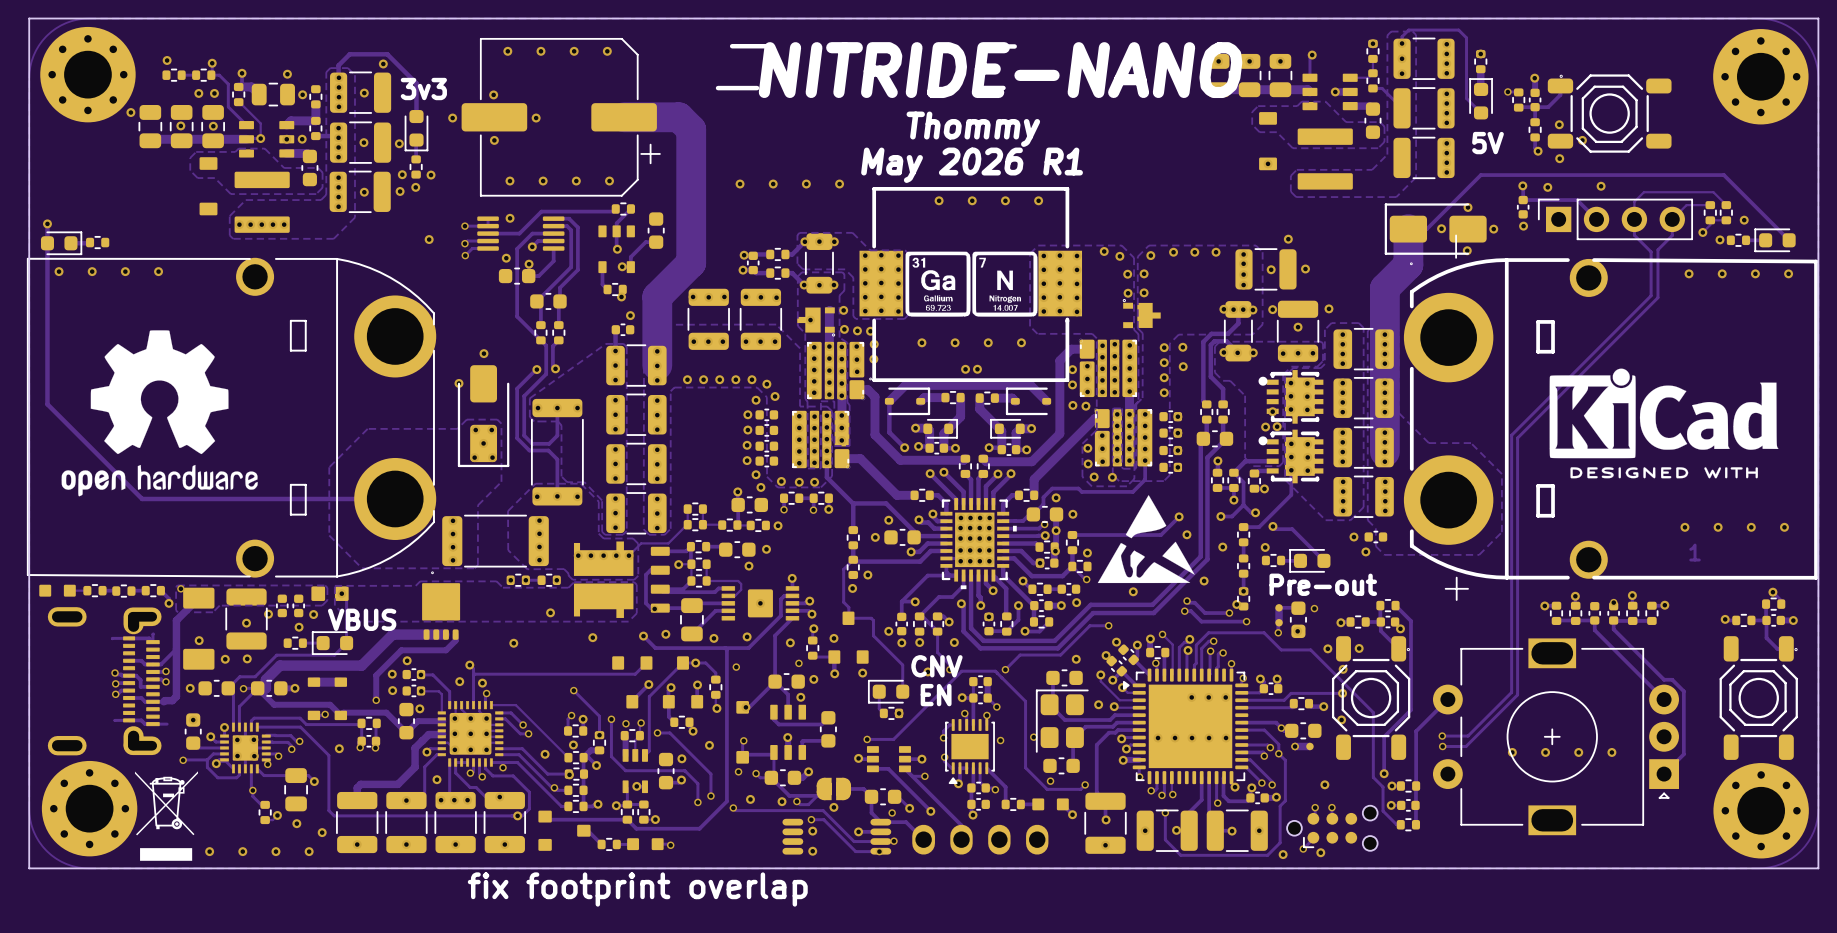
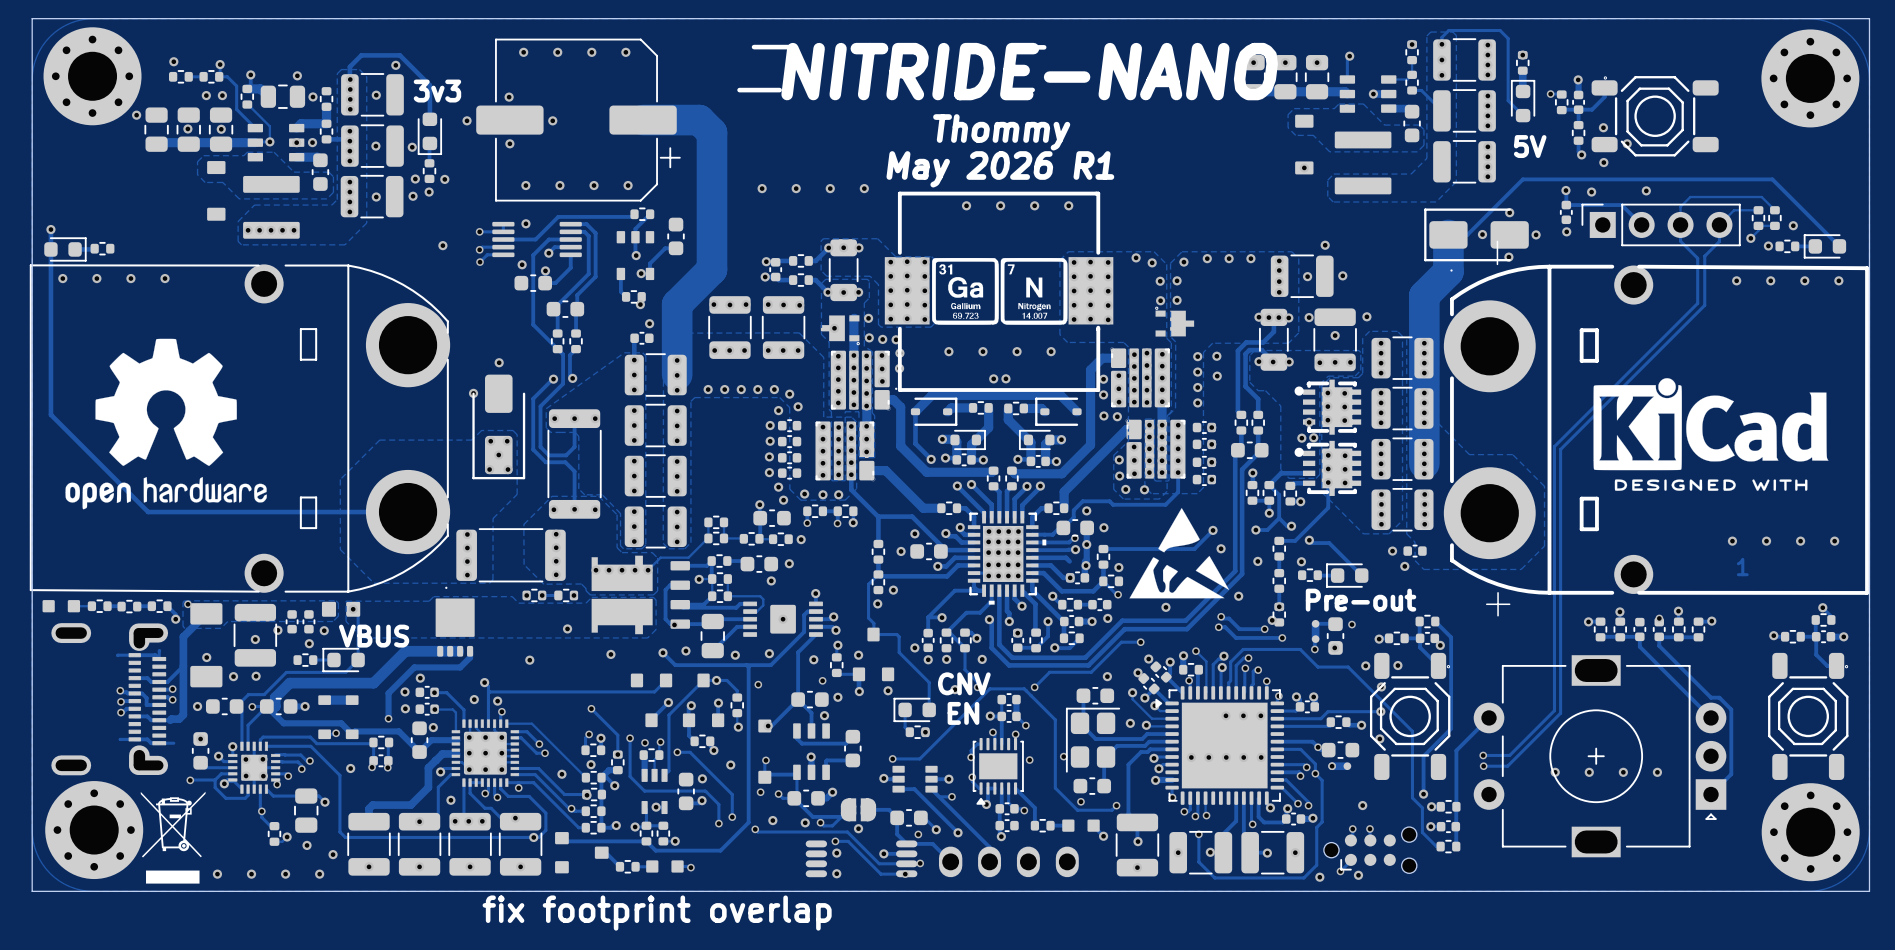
part: (1047, 547) -> none

